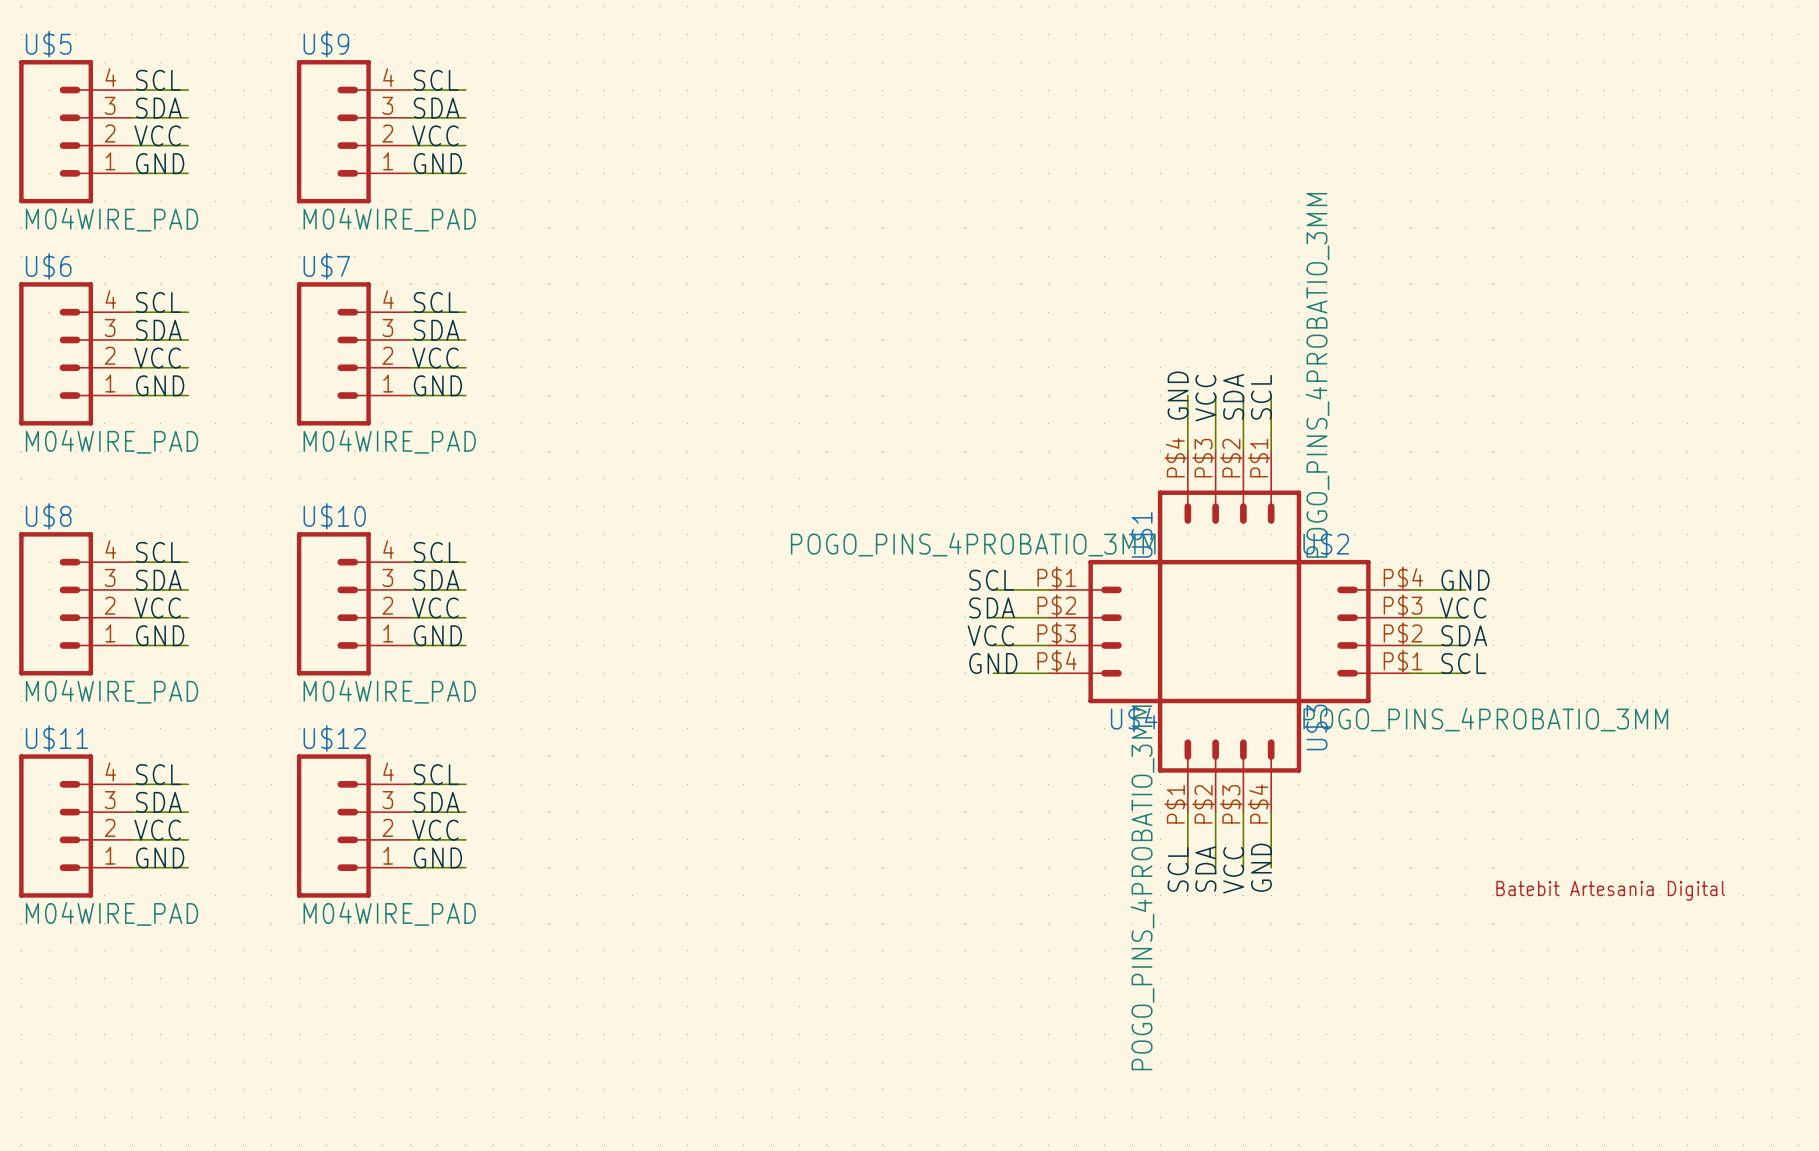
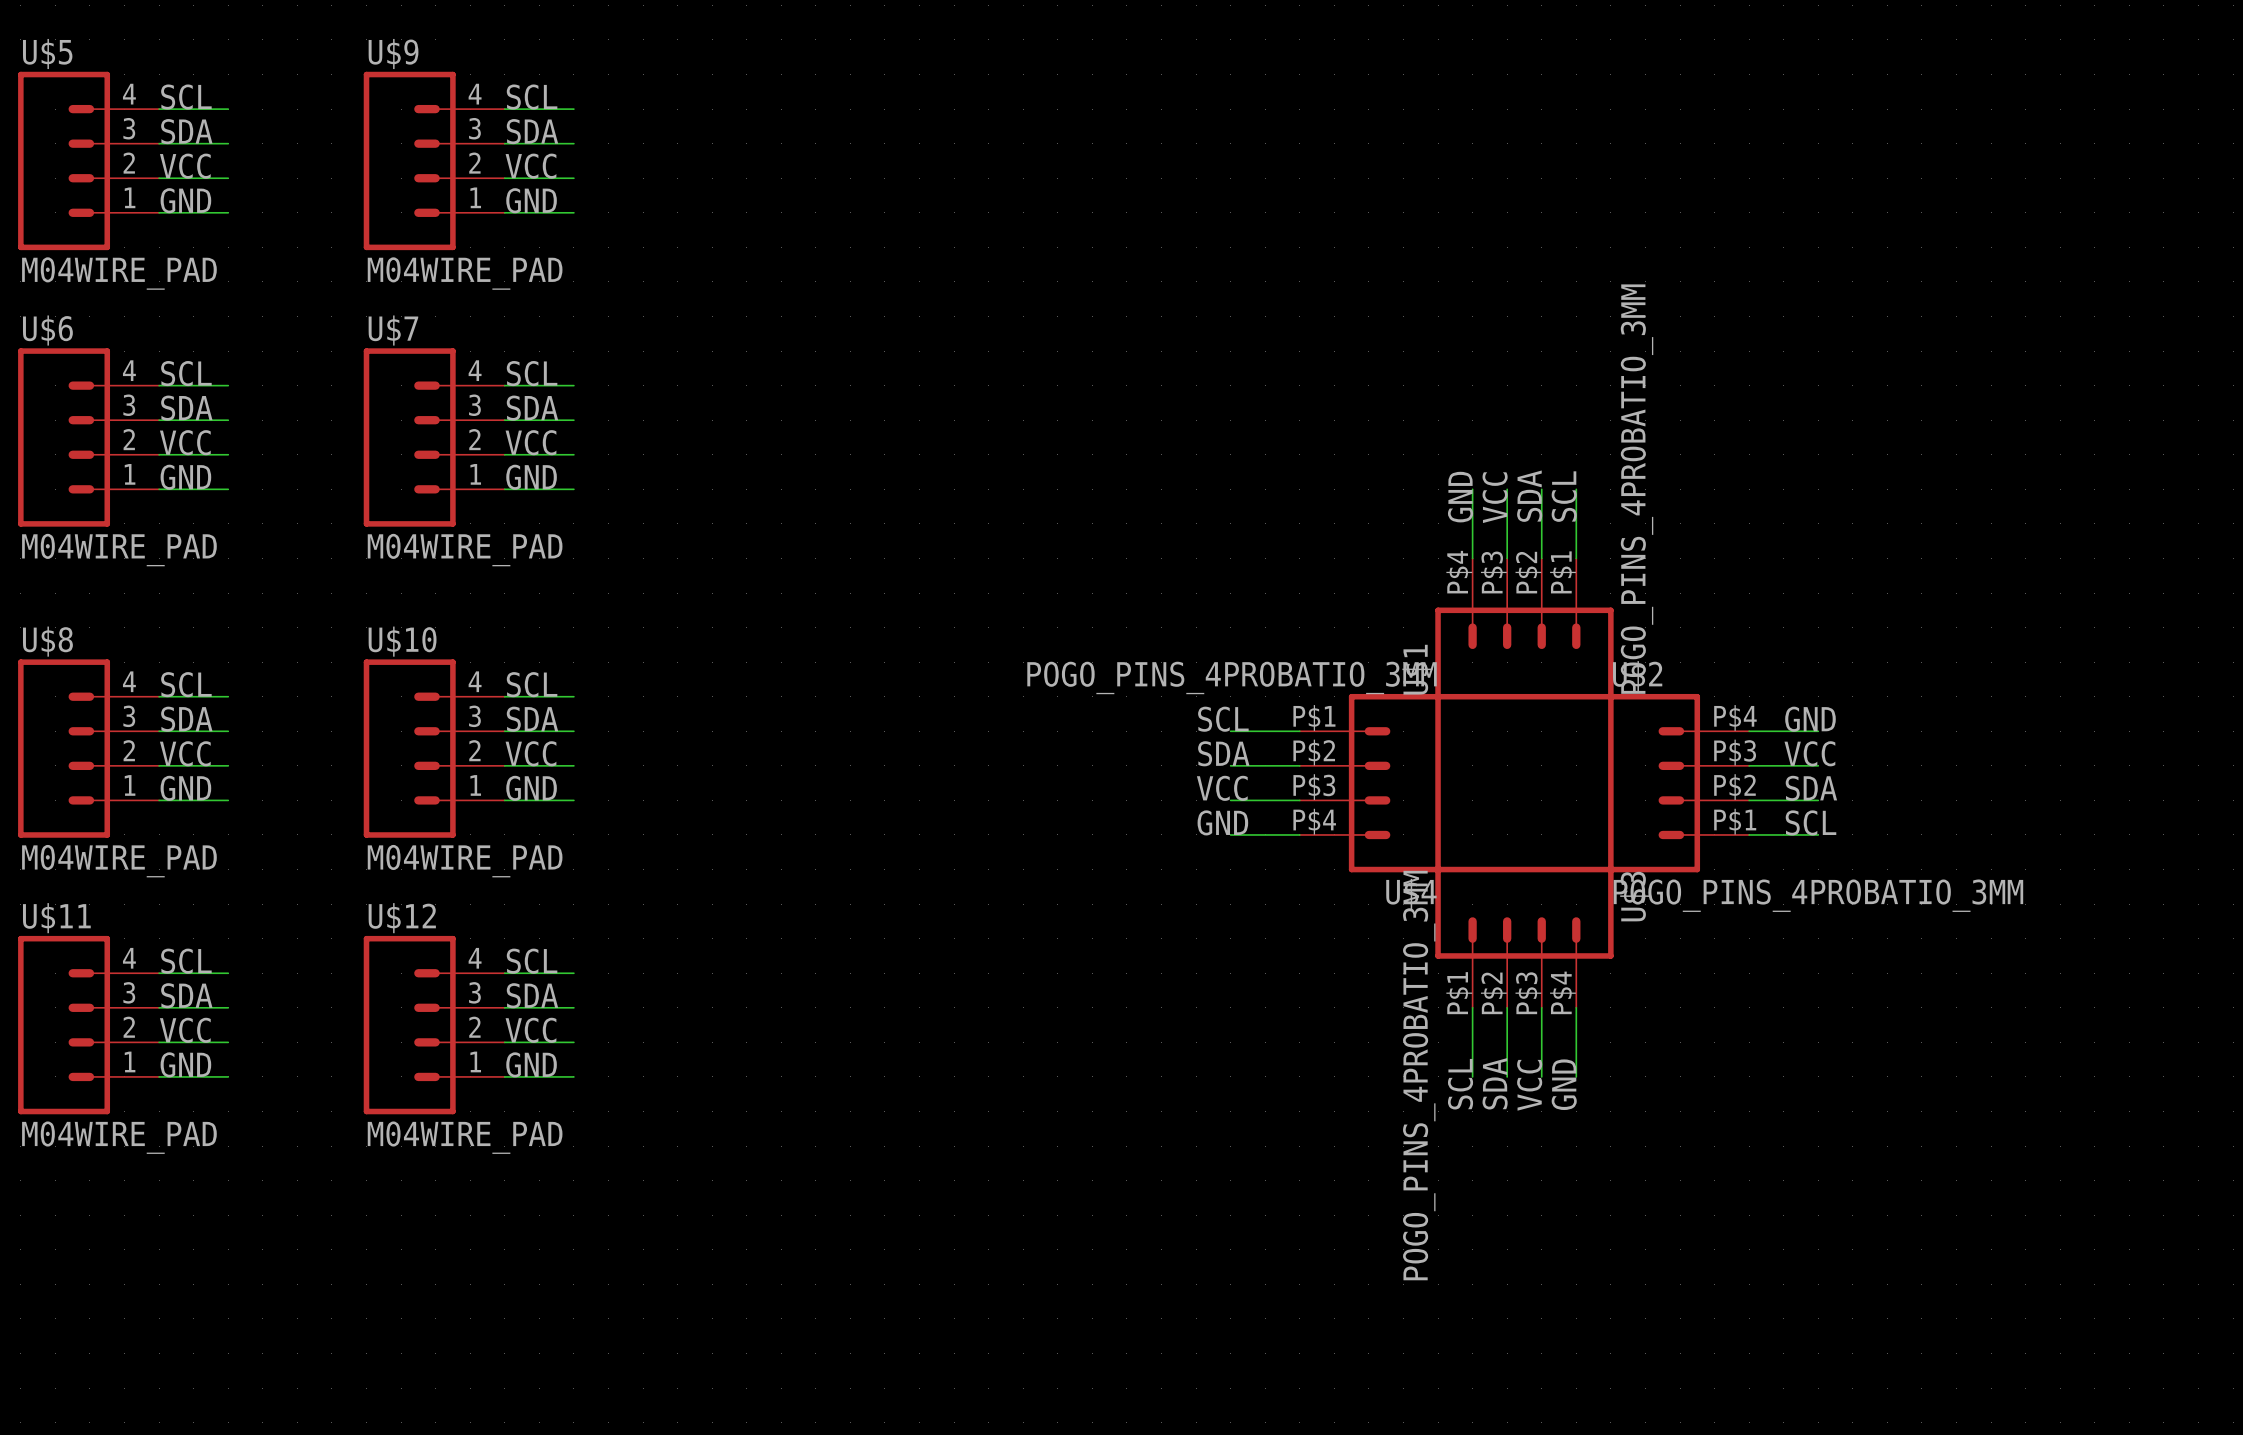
part: (1610, 890) -> none

